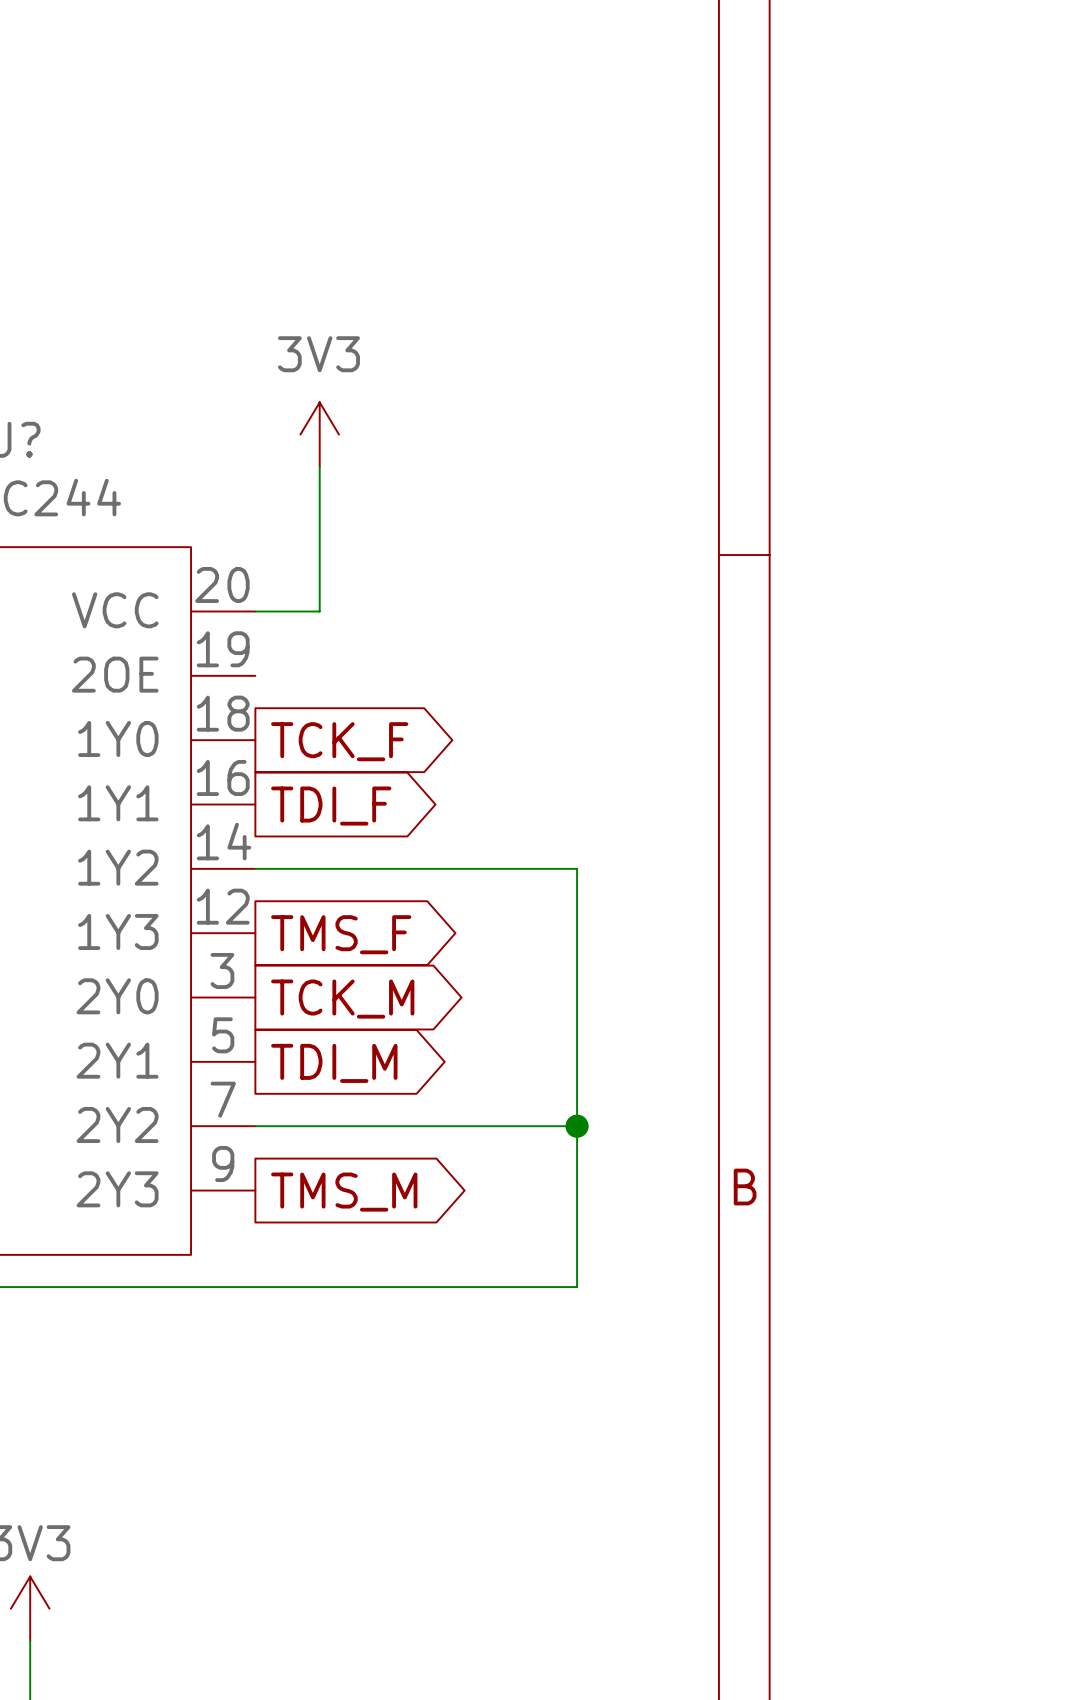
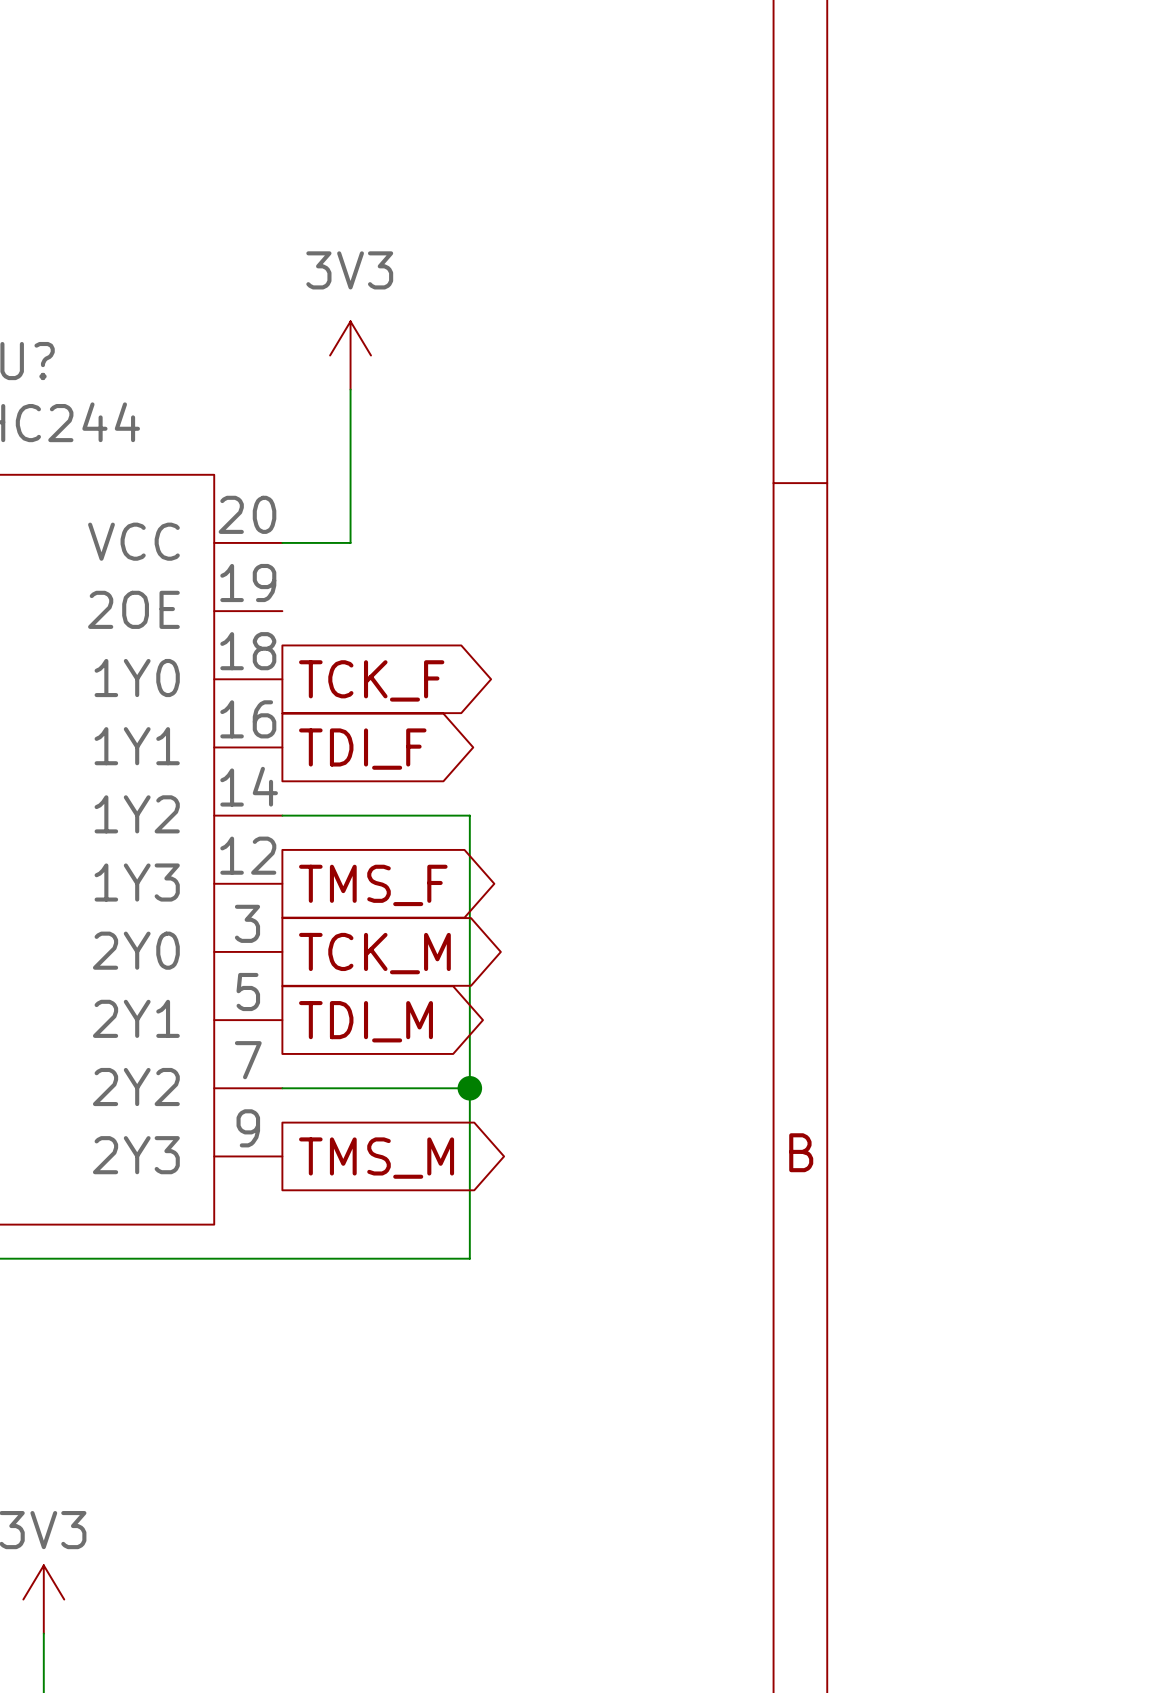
wire: (432, 868) (577, 868) (577, 1287) (432, 1287) -> (469, 815) (469, 1258)
wire: (432, 1126) (577, 1126) -> none
junction position: (577, 1126) -> (469, 1088)

